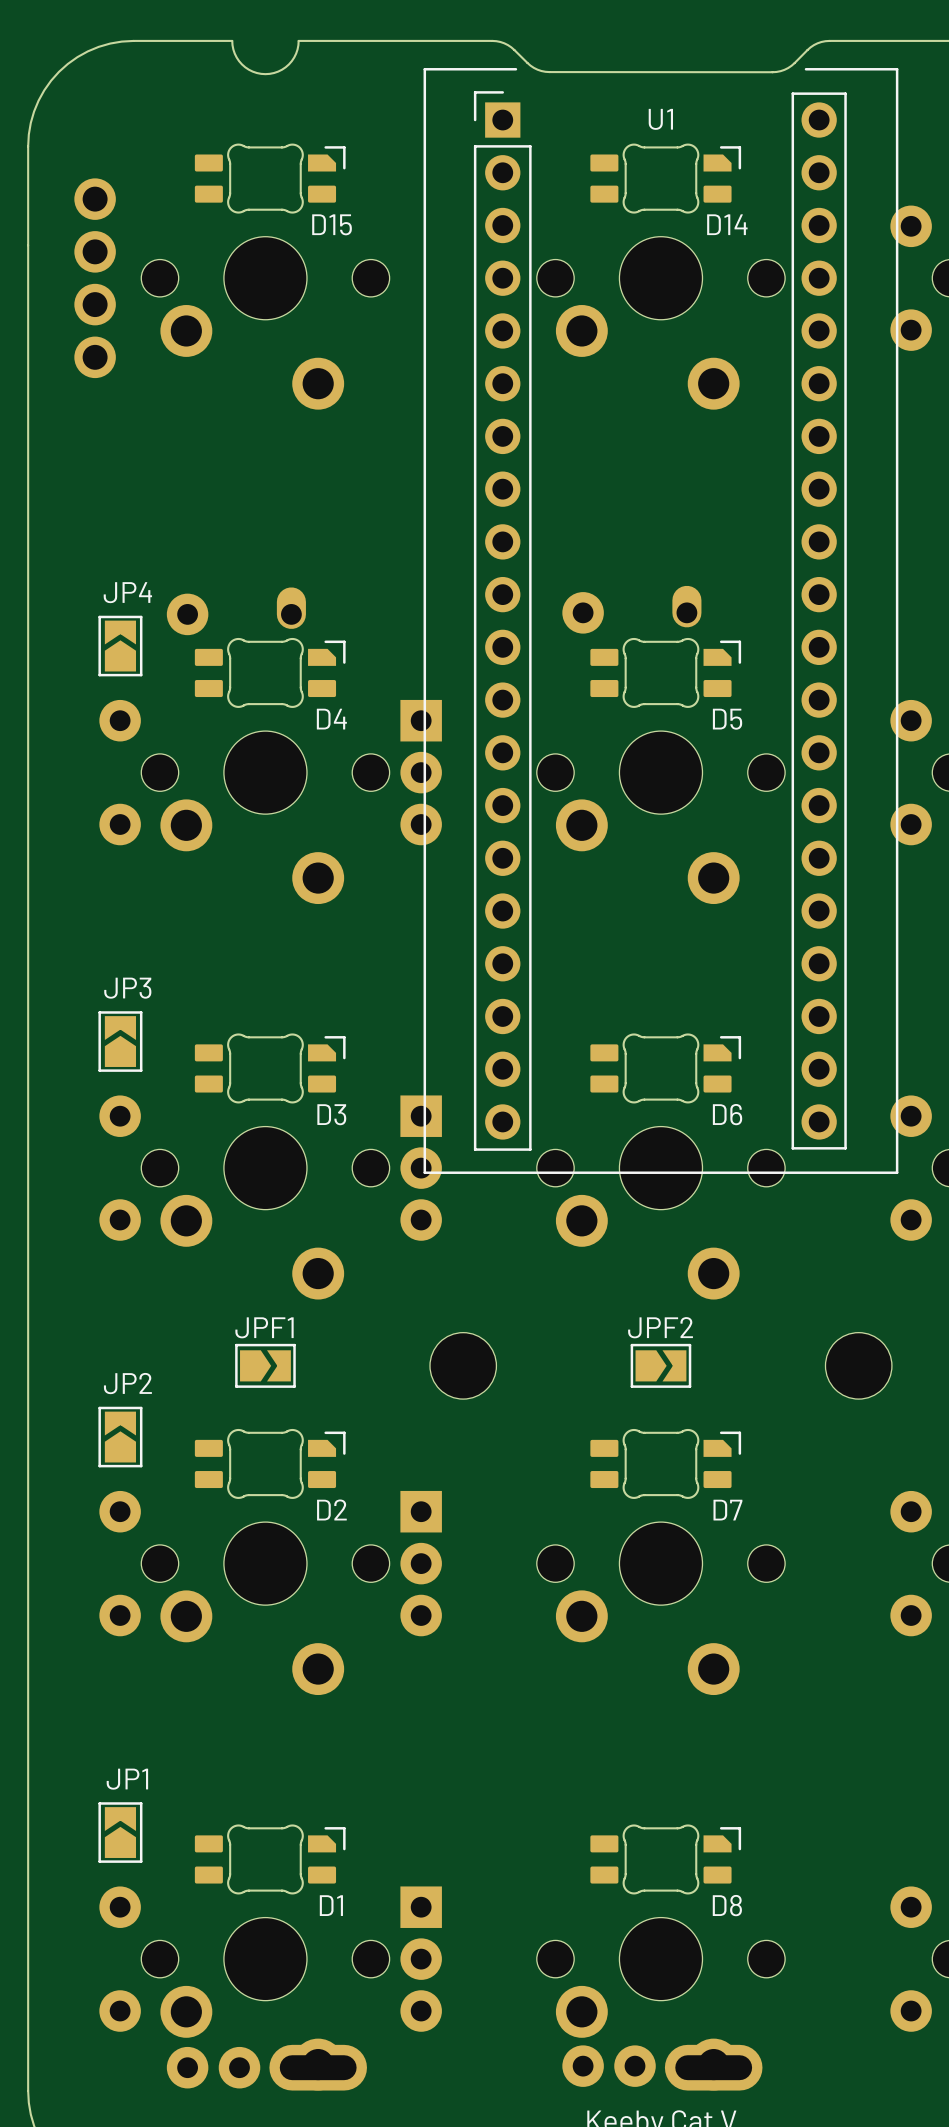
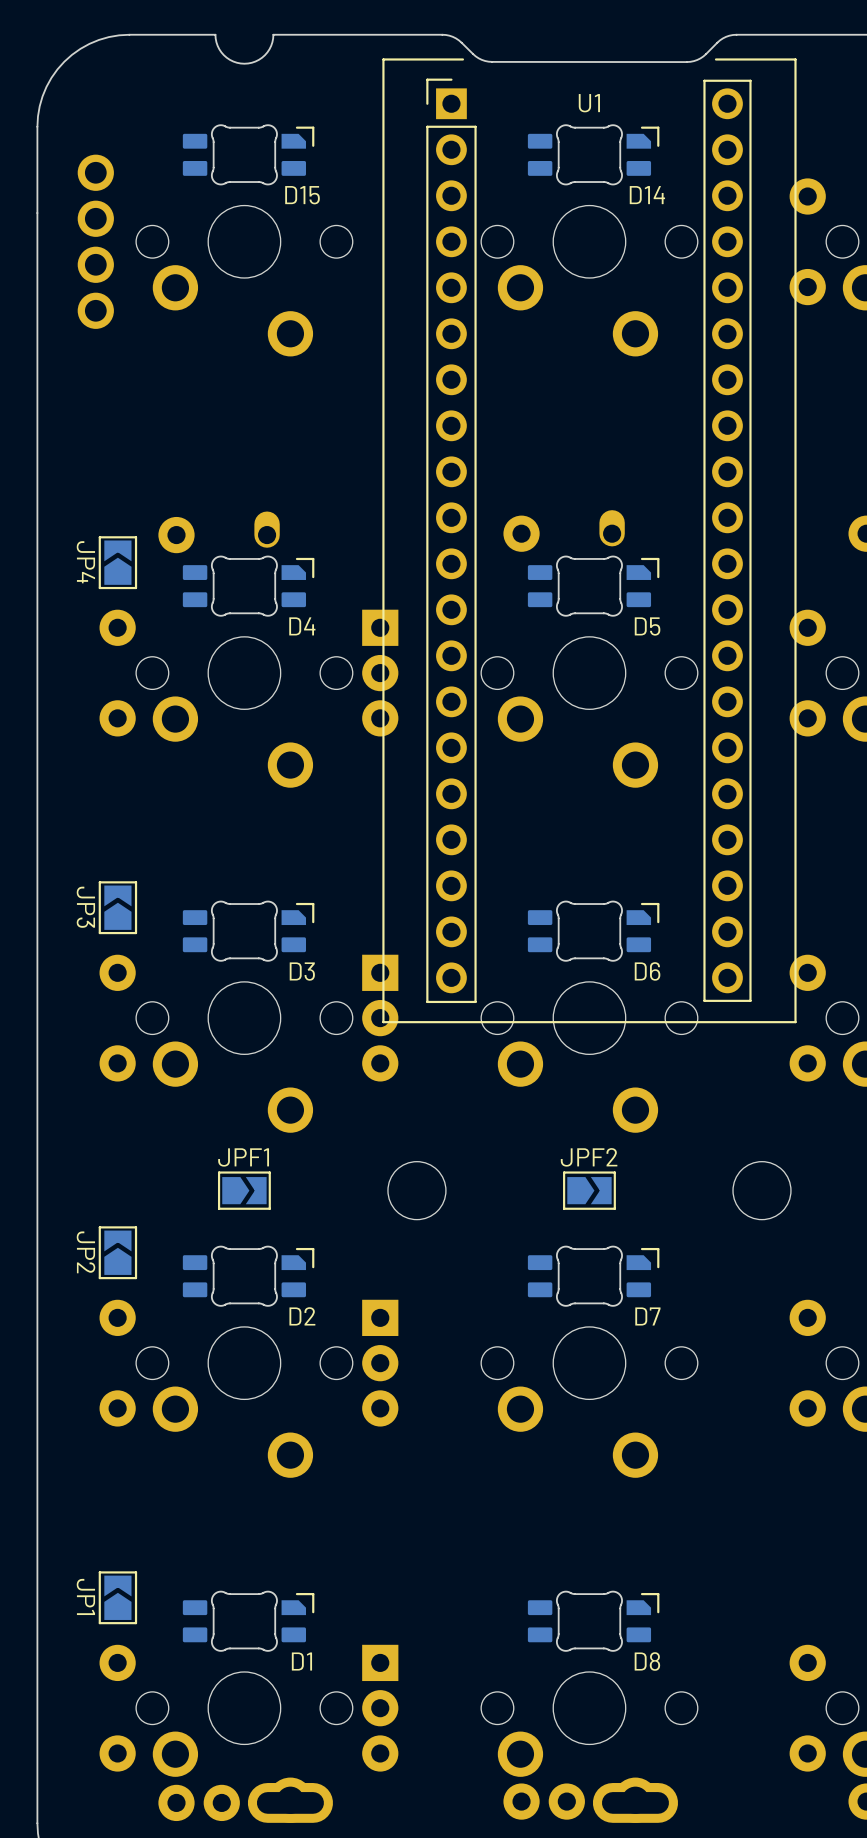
JP4 name rotation: 0° (127, 592) -> 90° clockwise (85, 562)
JP4 name position: JP4 (127, 592) -> JP4 (85, 562)
JP3 name rotation: 0° (127, 988) -> 90° clockwise (85, 907)
JP3 name position: JP3 (127, 988) -> JP3 (85, 907)
JP2 name rotation: 0° (127, 1383) -> 90° clockwise (85, 1252)
JP2 name position: JP2 (127, 1383) -> JP2 (85, 1252)
JP1 name rotation: 0° (127, 1779) -> 90° clockwise (85, 1596)
JP1 name position: JP1 (127, 1779) -> JP1 (85, 1596)

